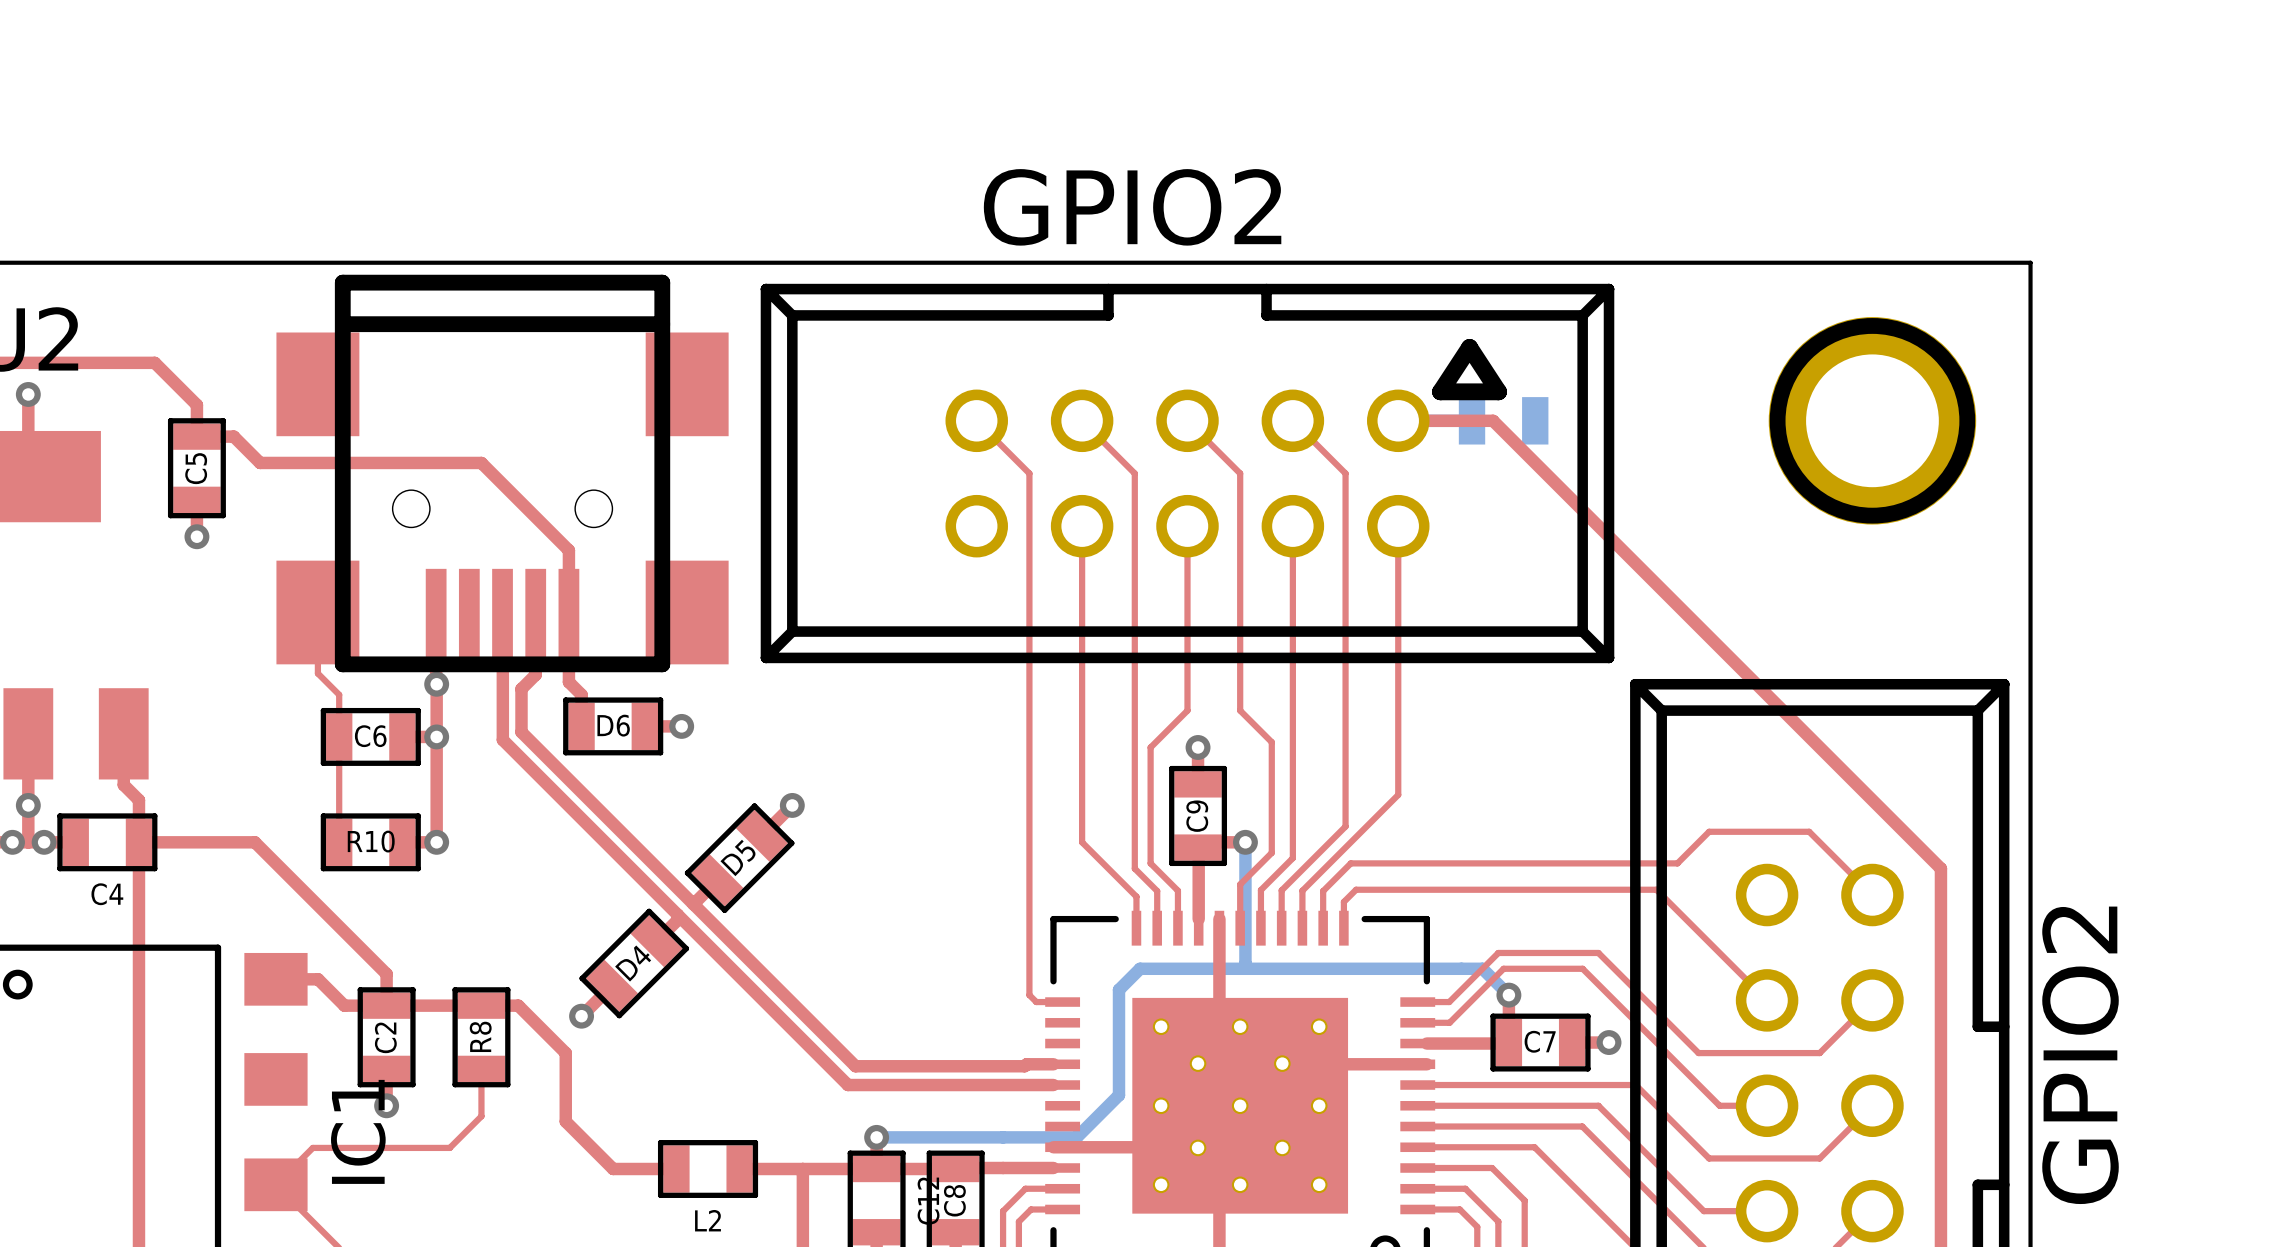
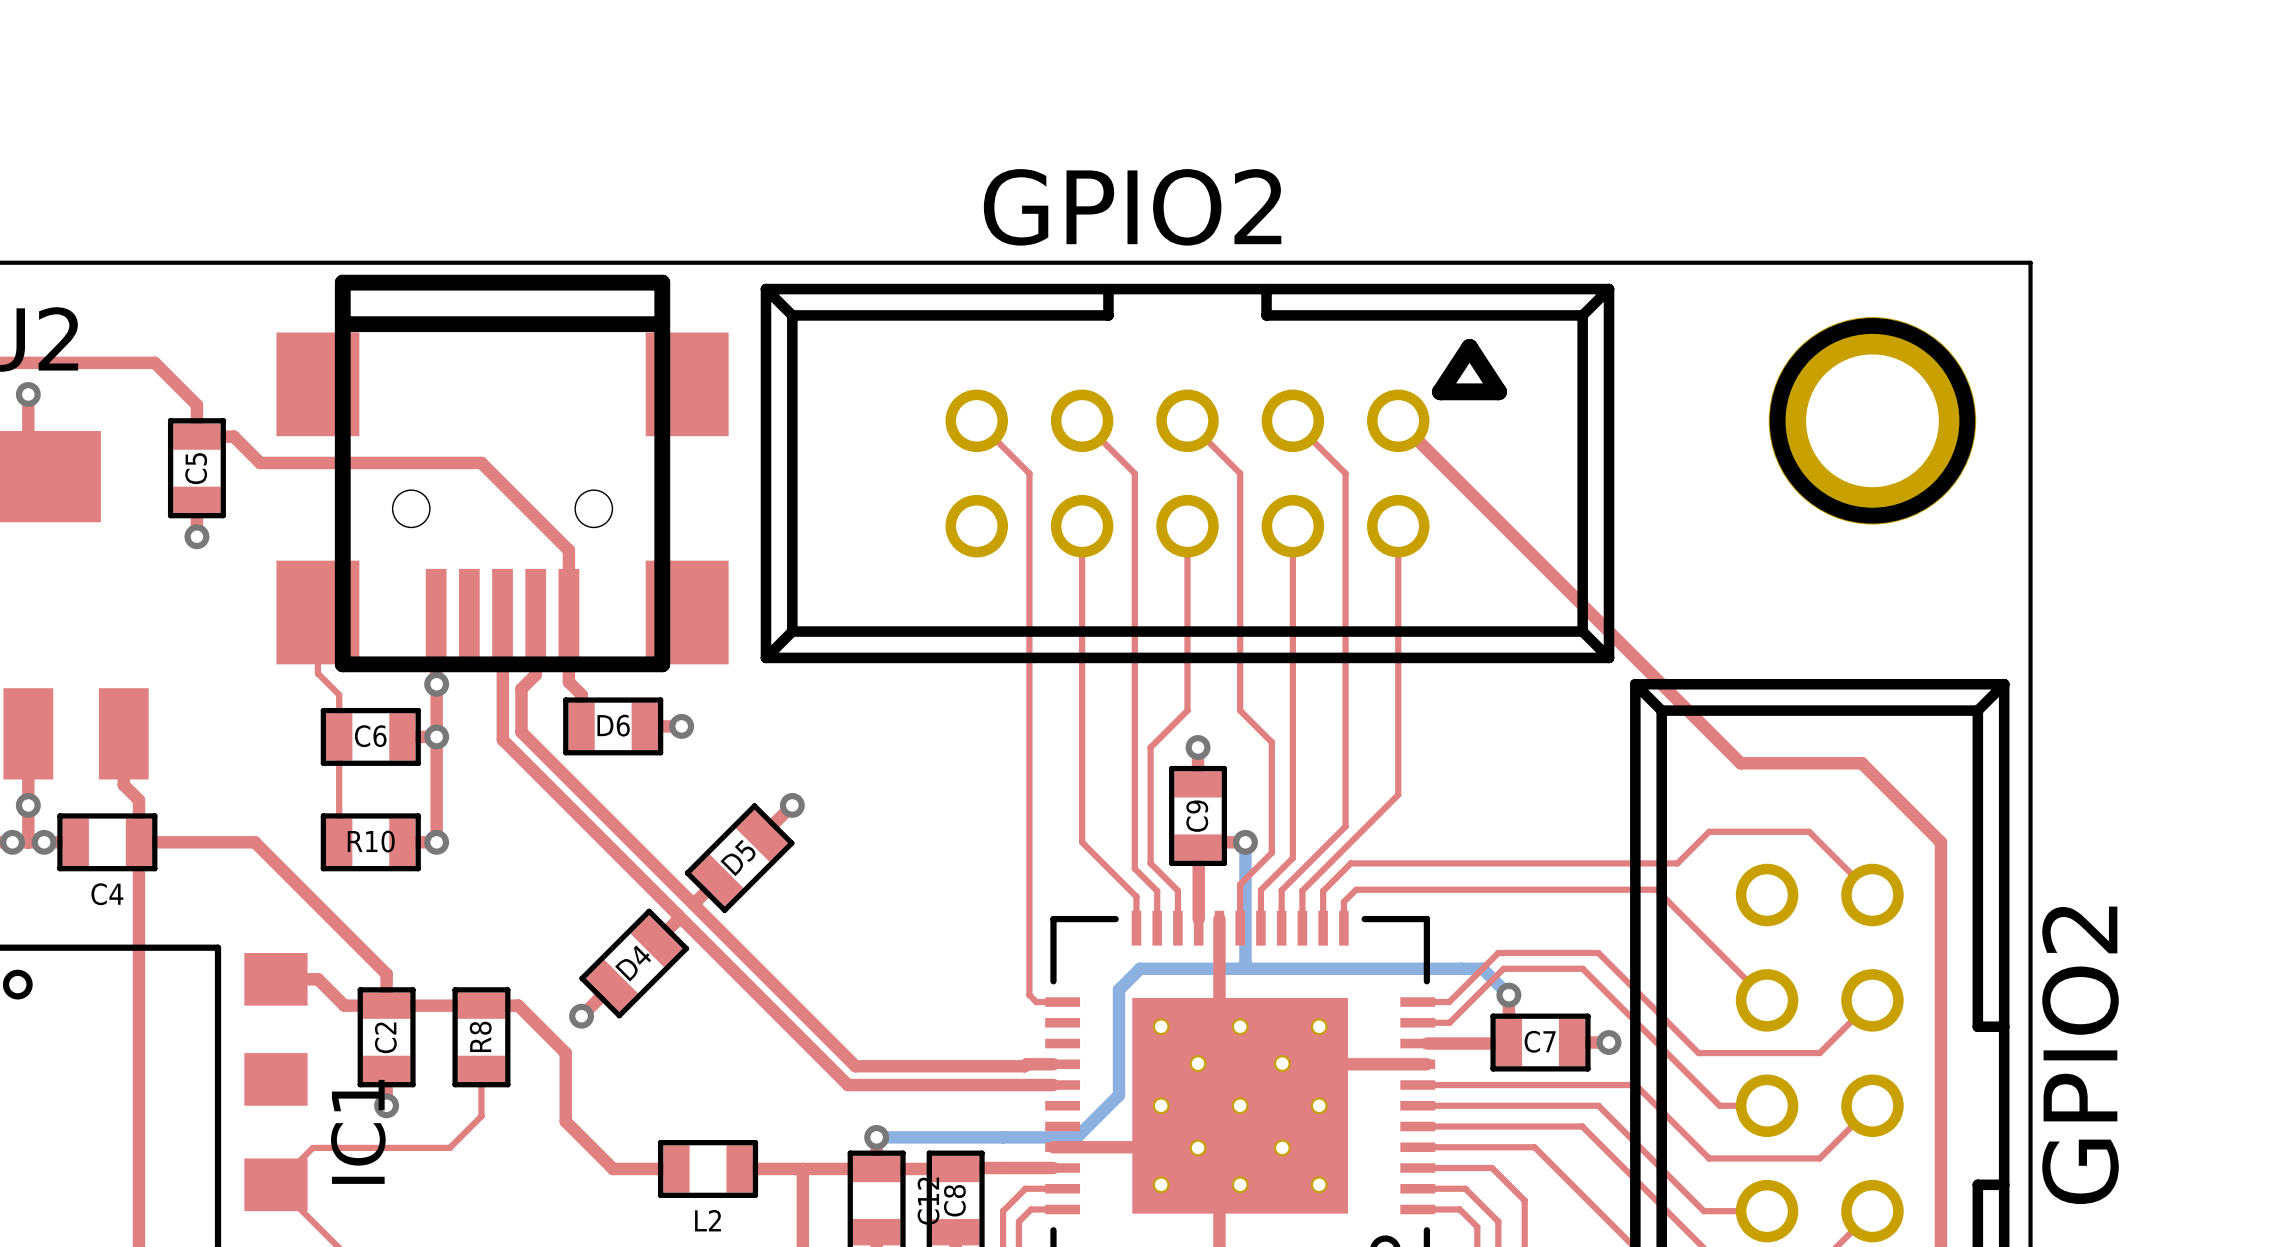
top track: (1398, 420) (1493, 420) (1940, 868) -> (1398, 420) (1740, 763) (1861, 763) (1940, 842) (1940, 868)
part: (1503, 420) -> none

